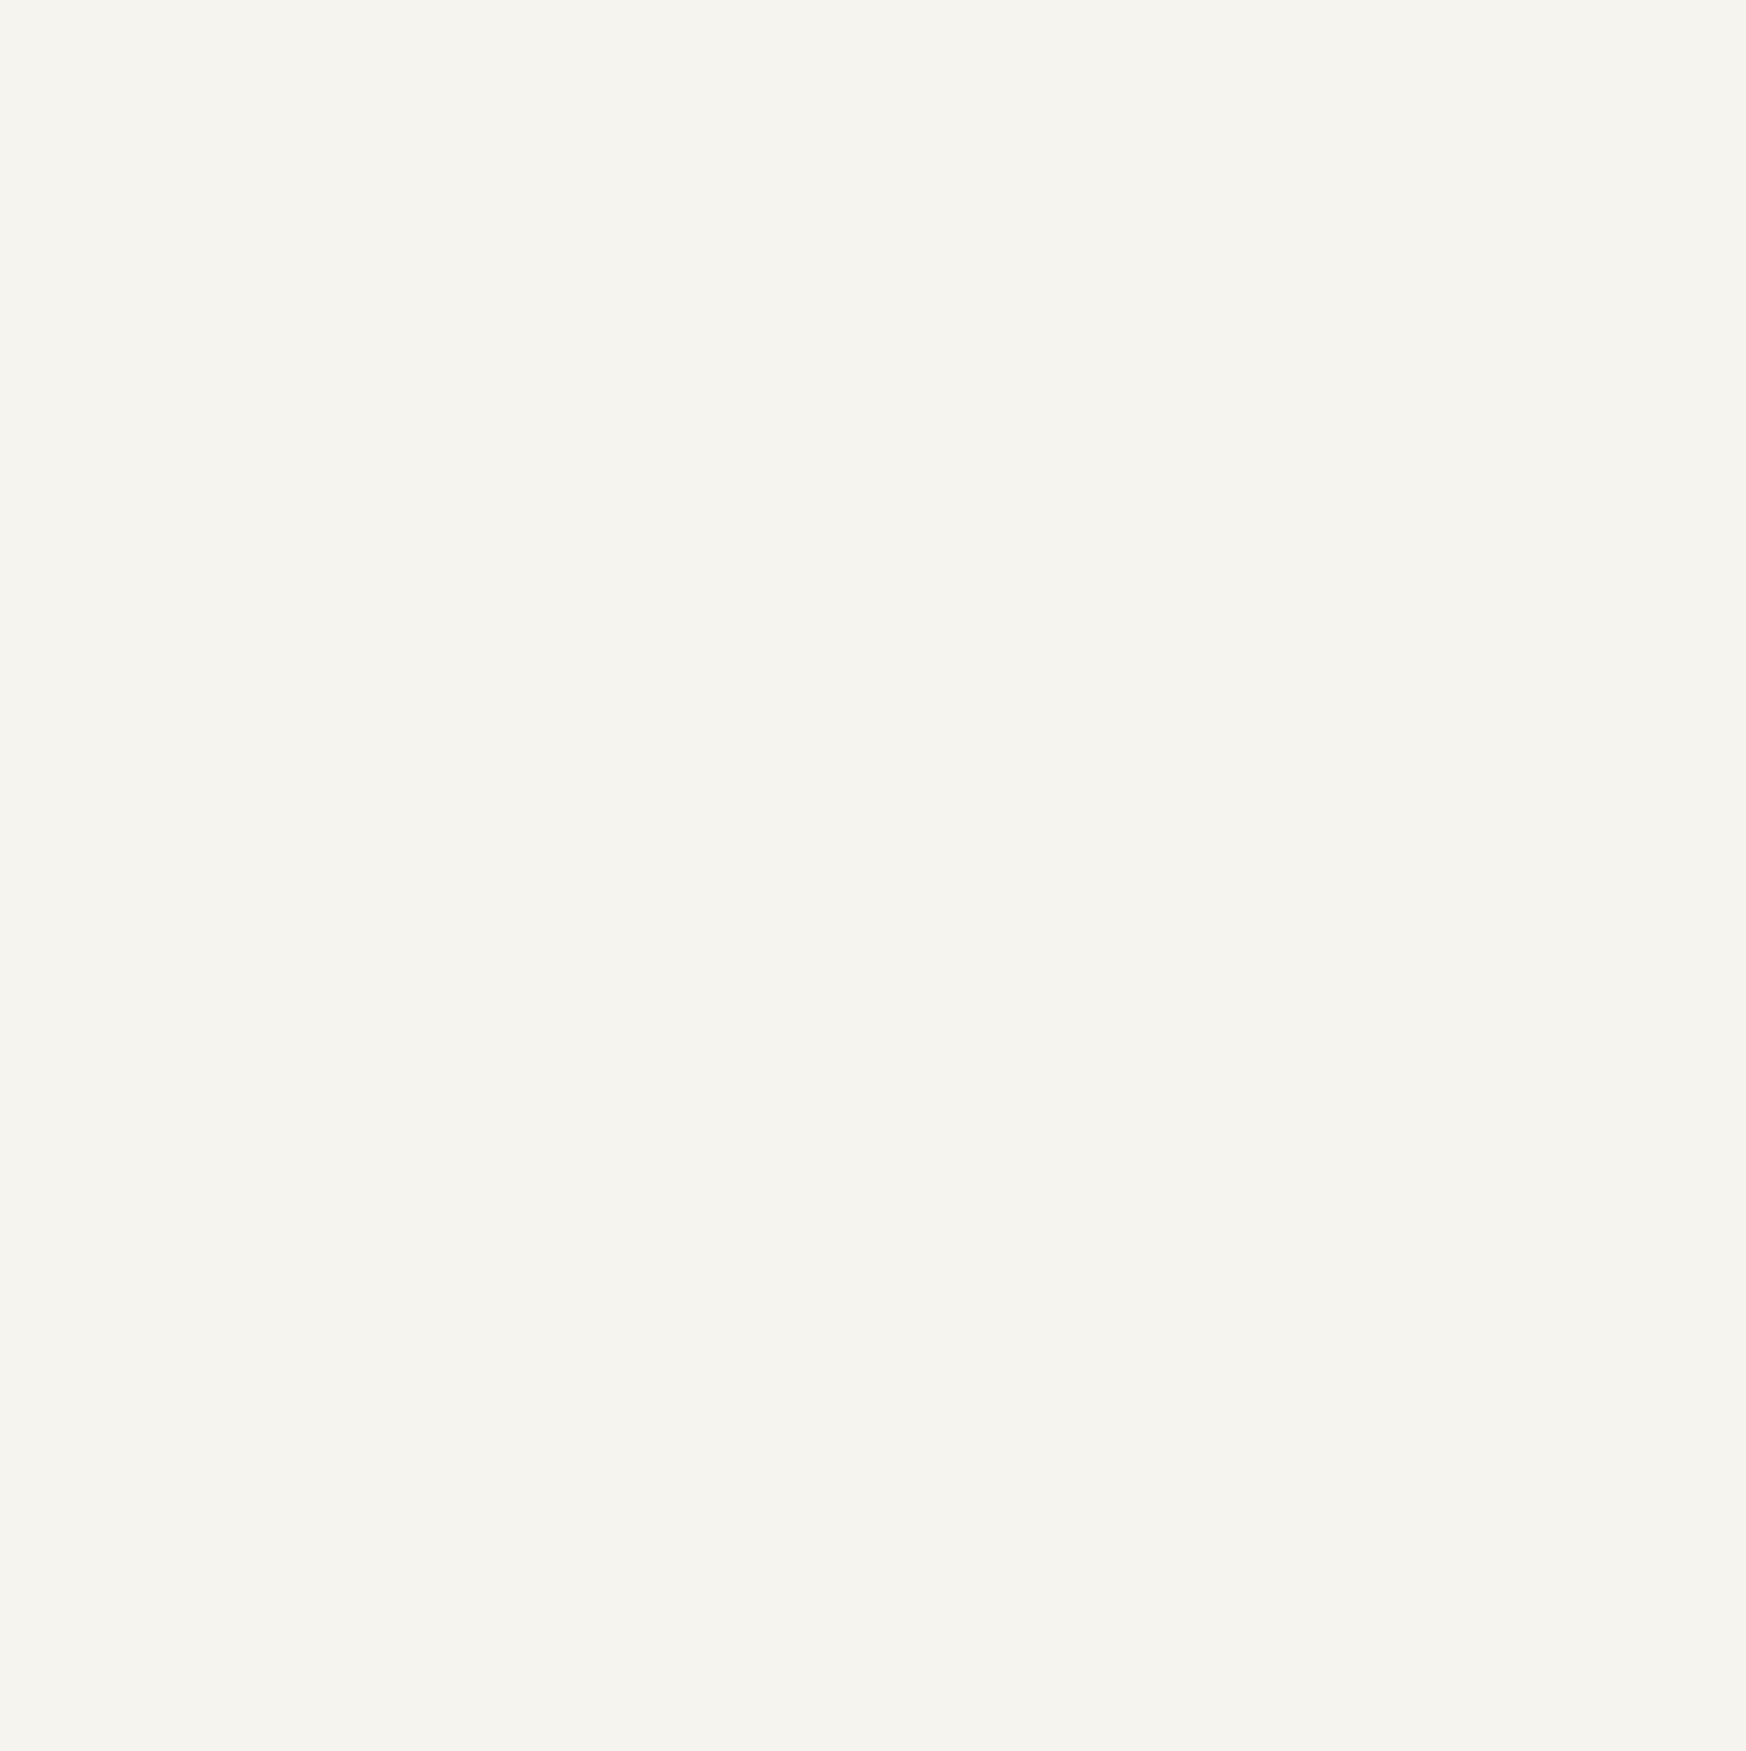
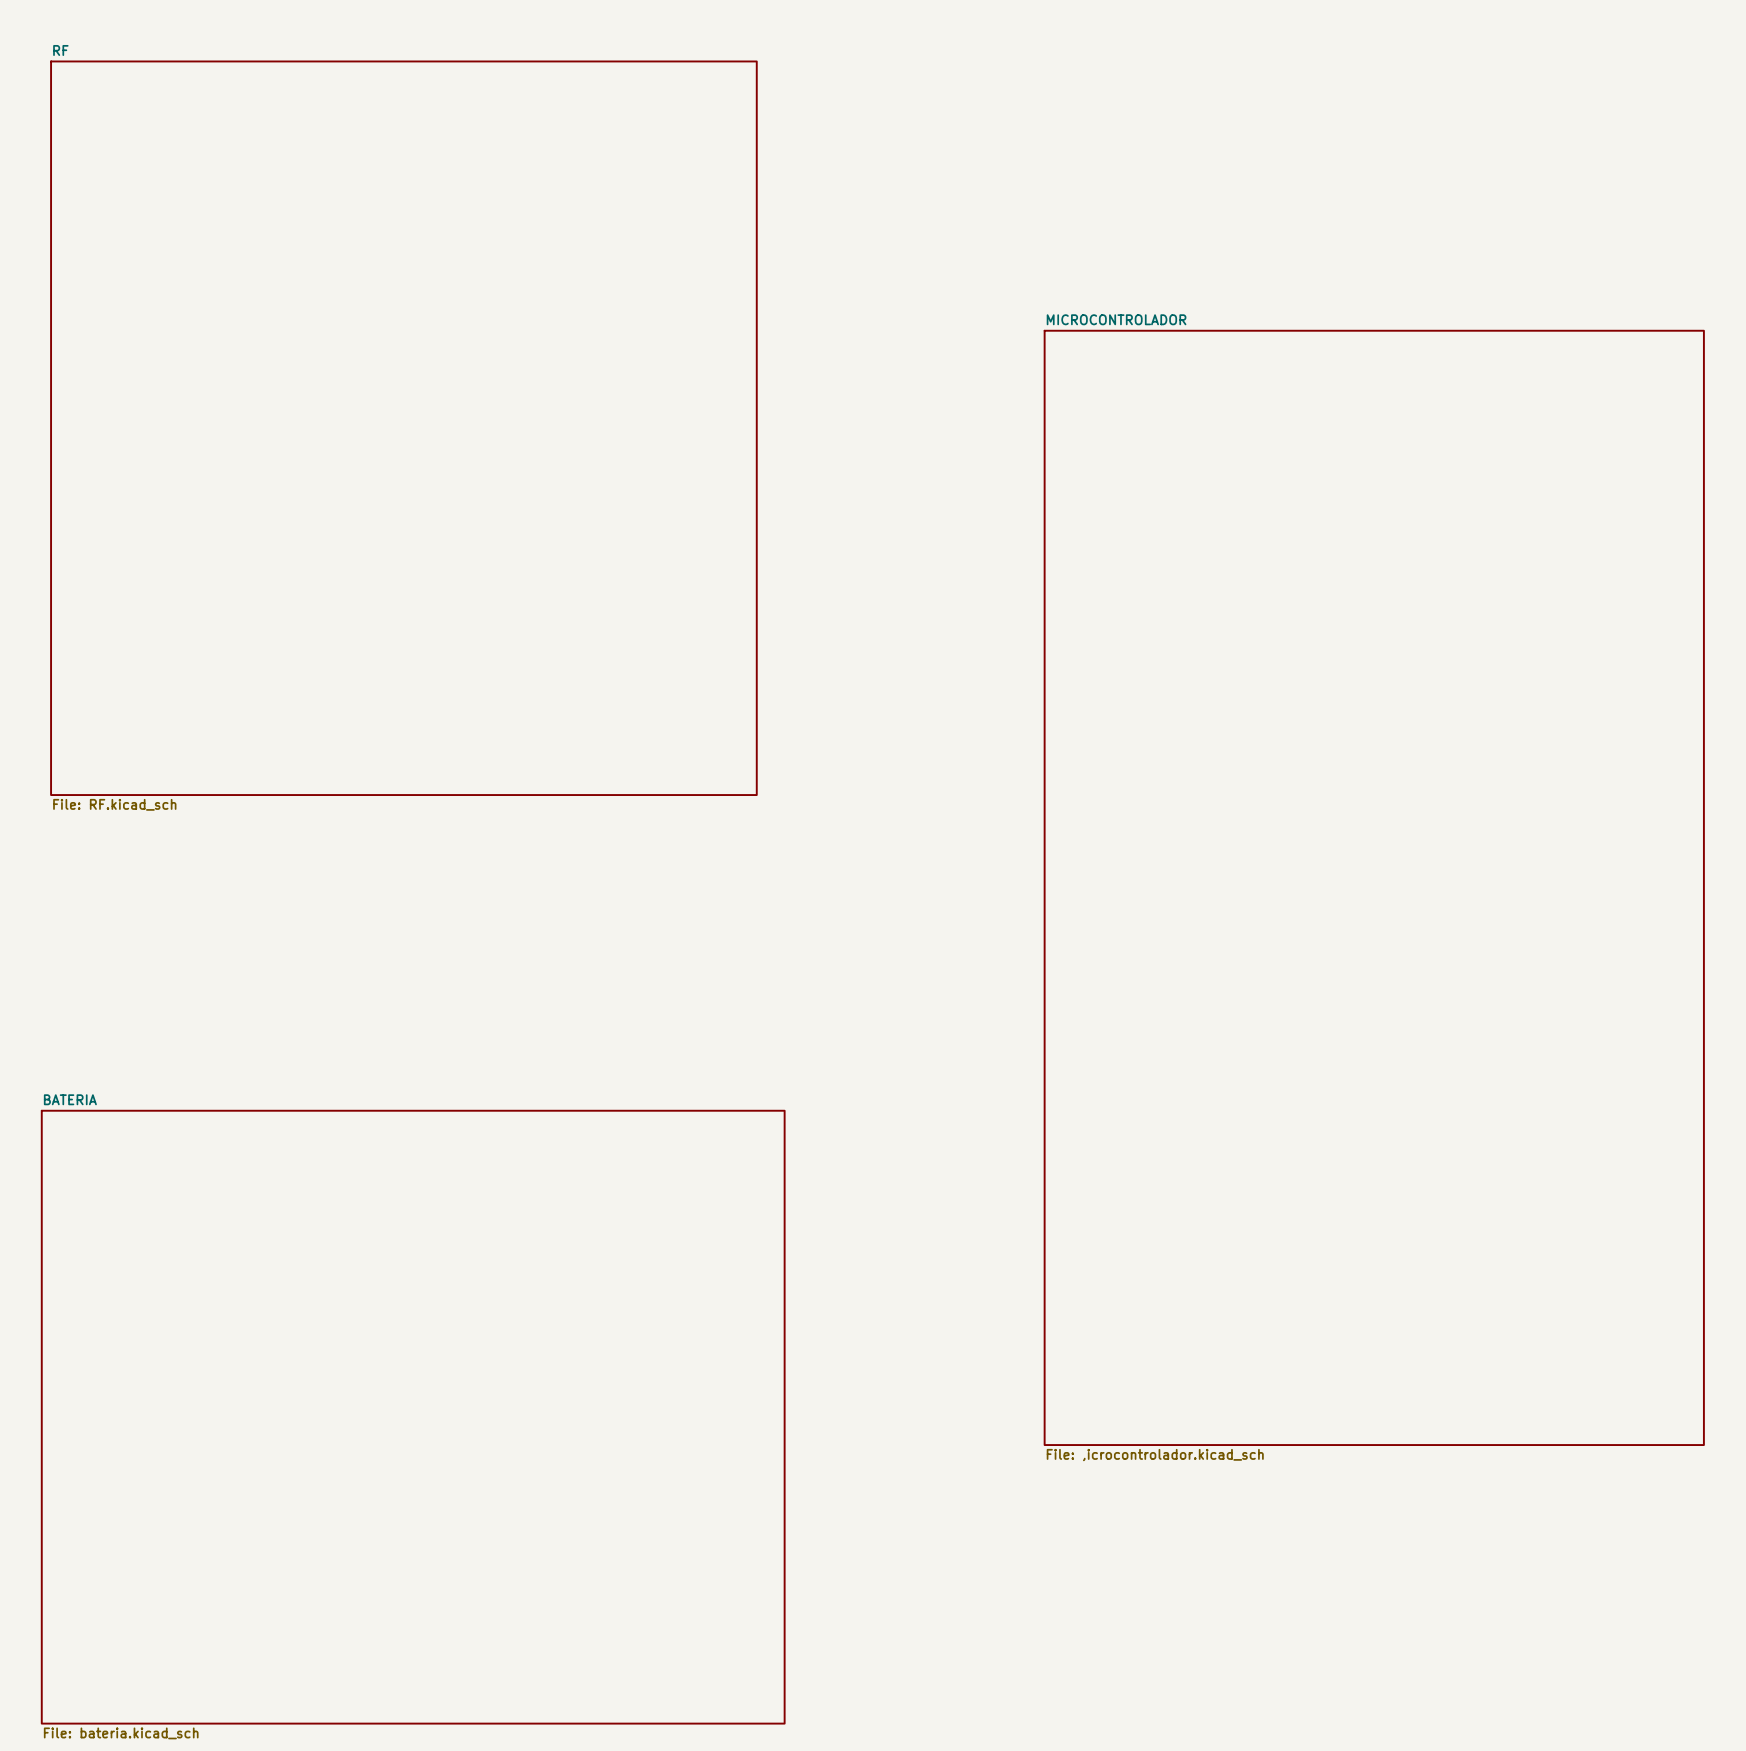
sheet RF: none -> File: RF.kicad_sch (403, 428)
sheet MICROCONTROLADOR: none -> File: ,icrocontrolador.kicad_sch (1374, 887)
sheet BATERIA: none -> File: bateria.kicad_sch (413, 1417)

